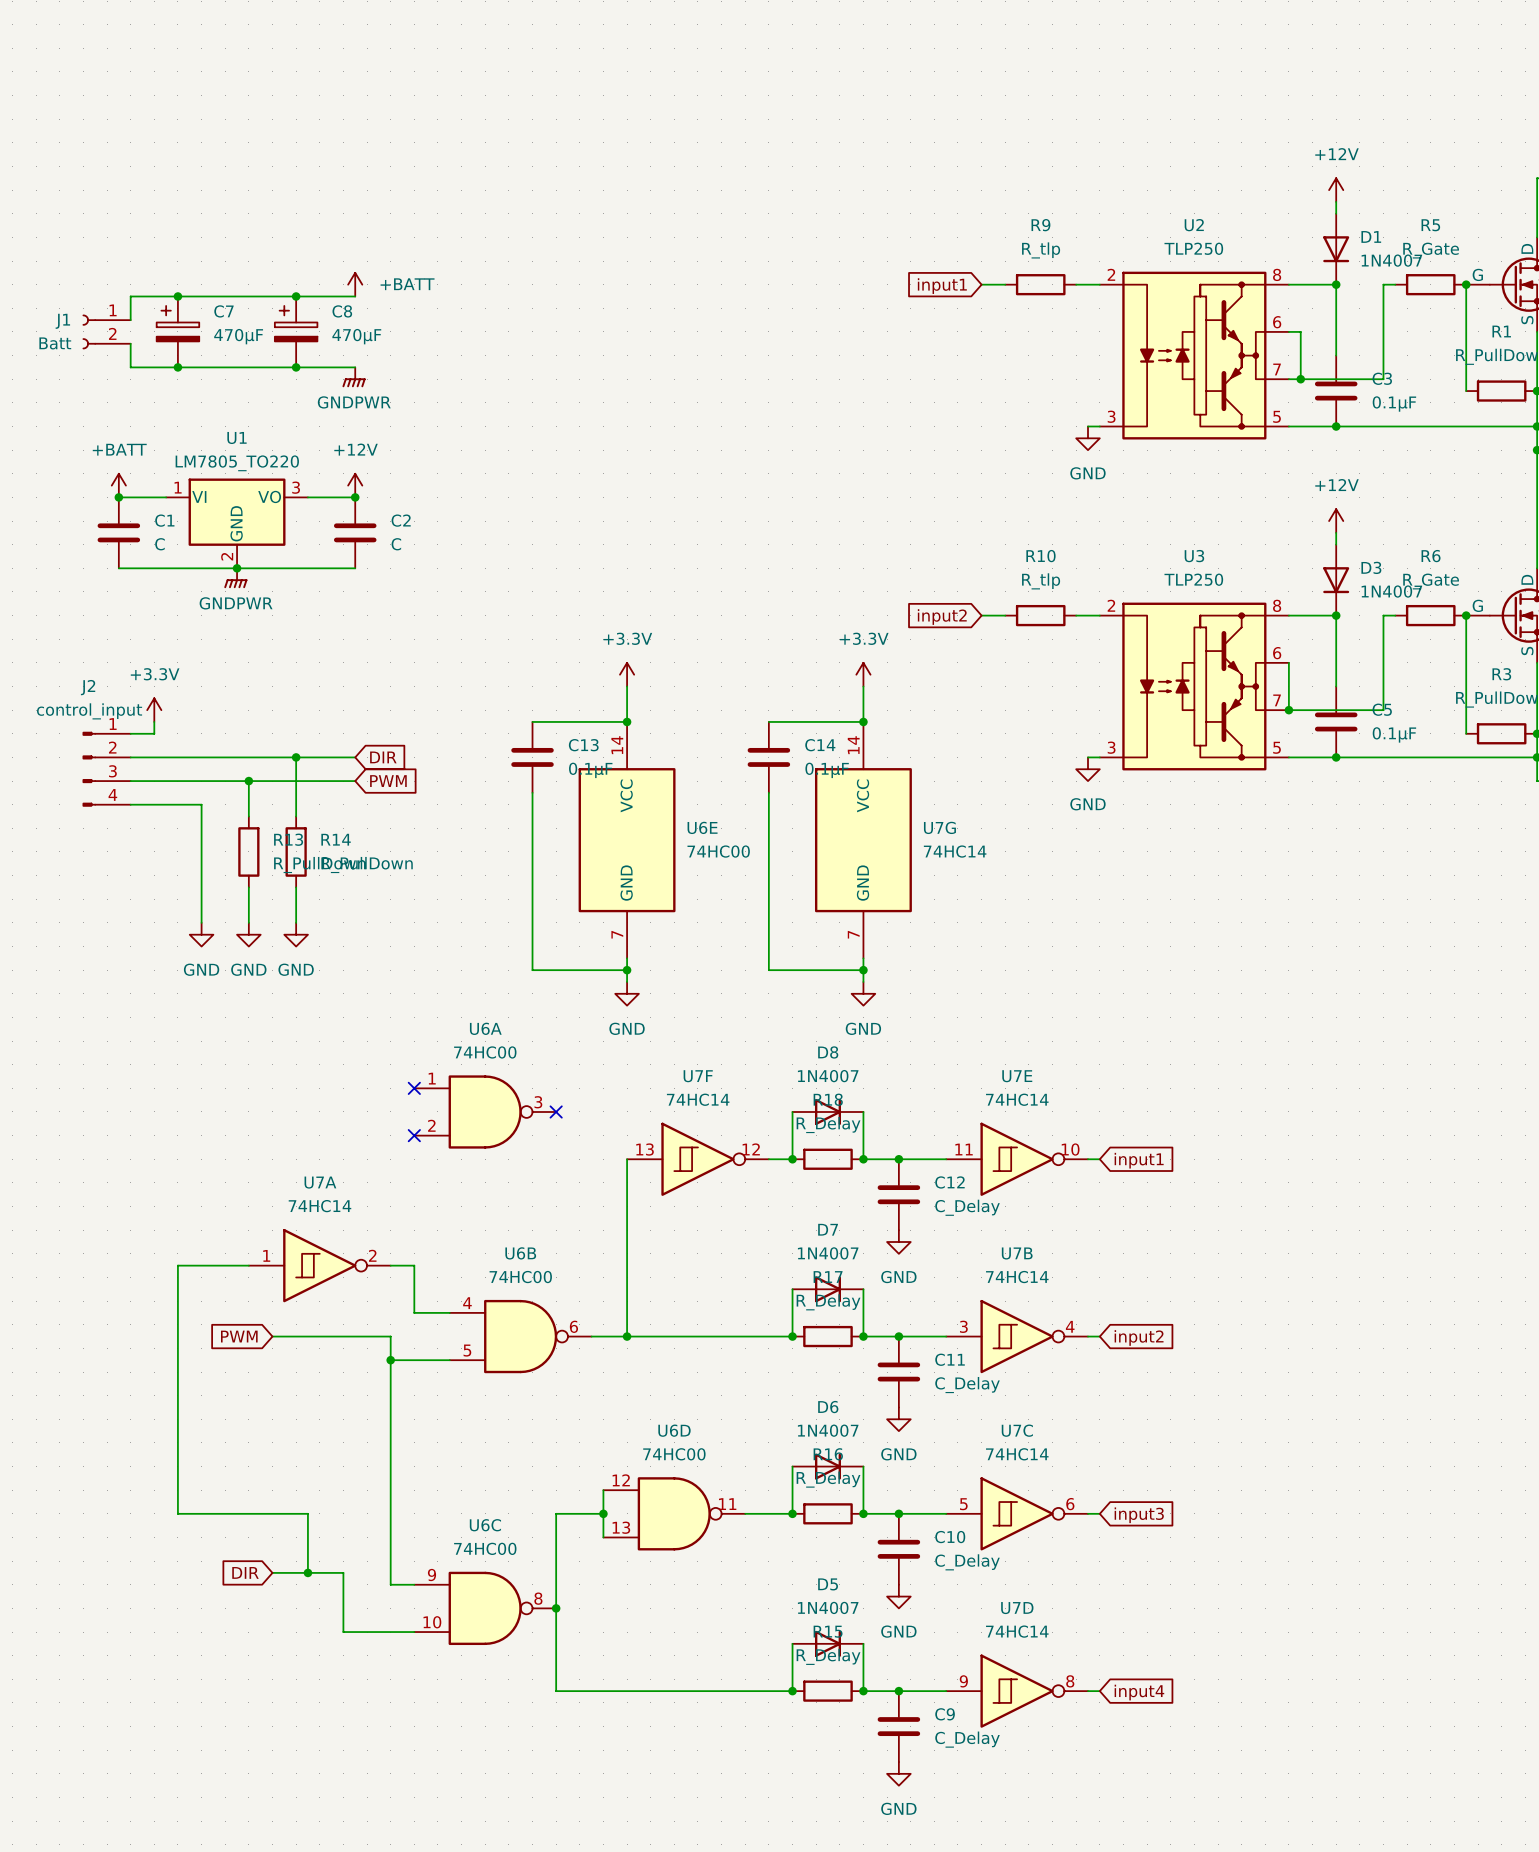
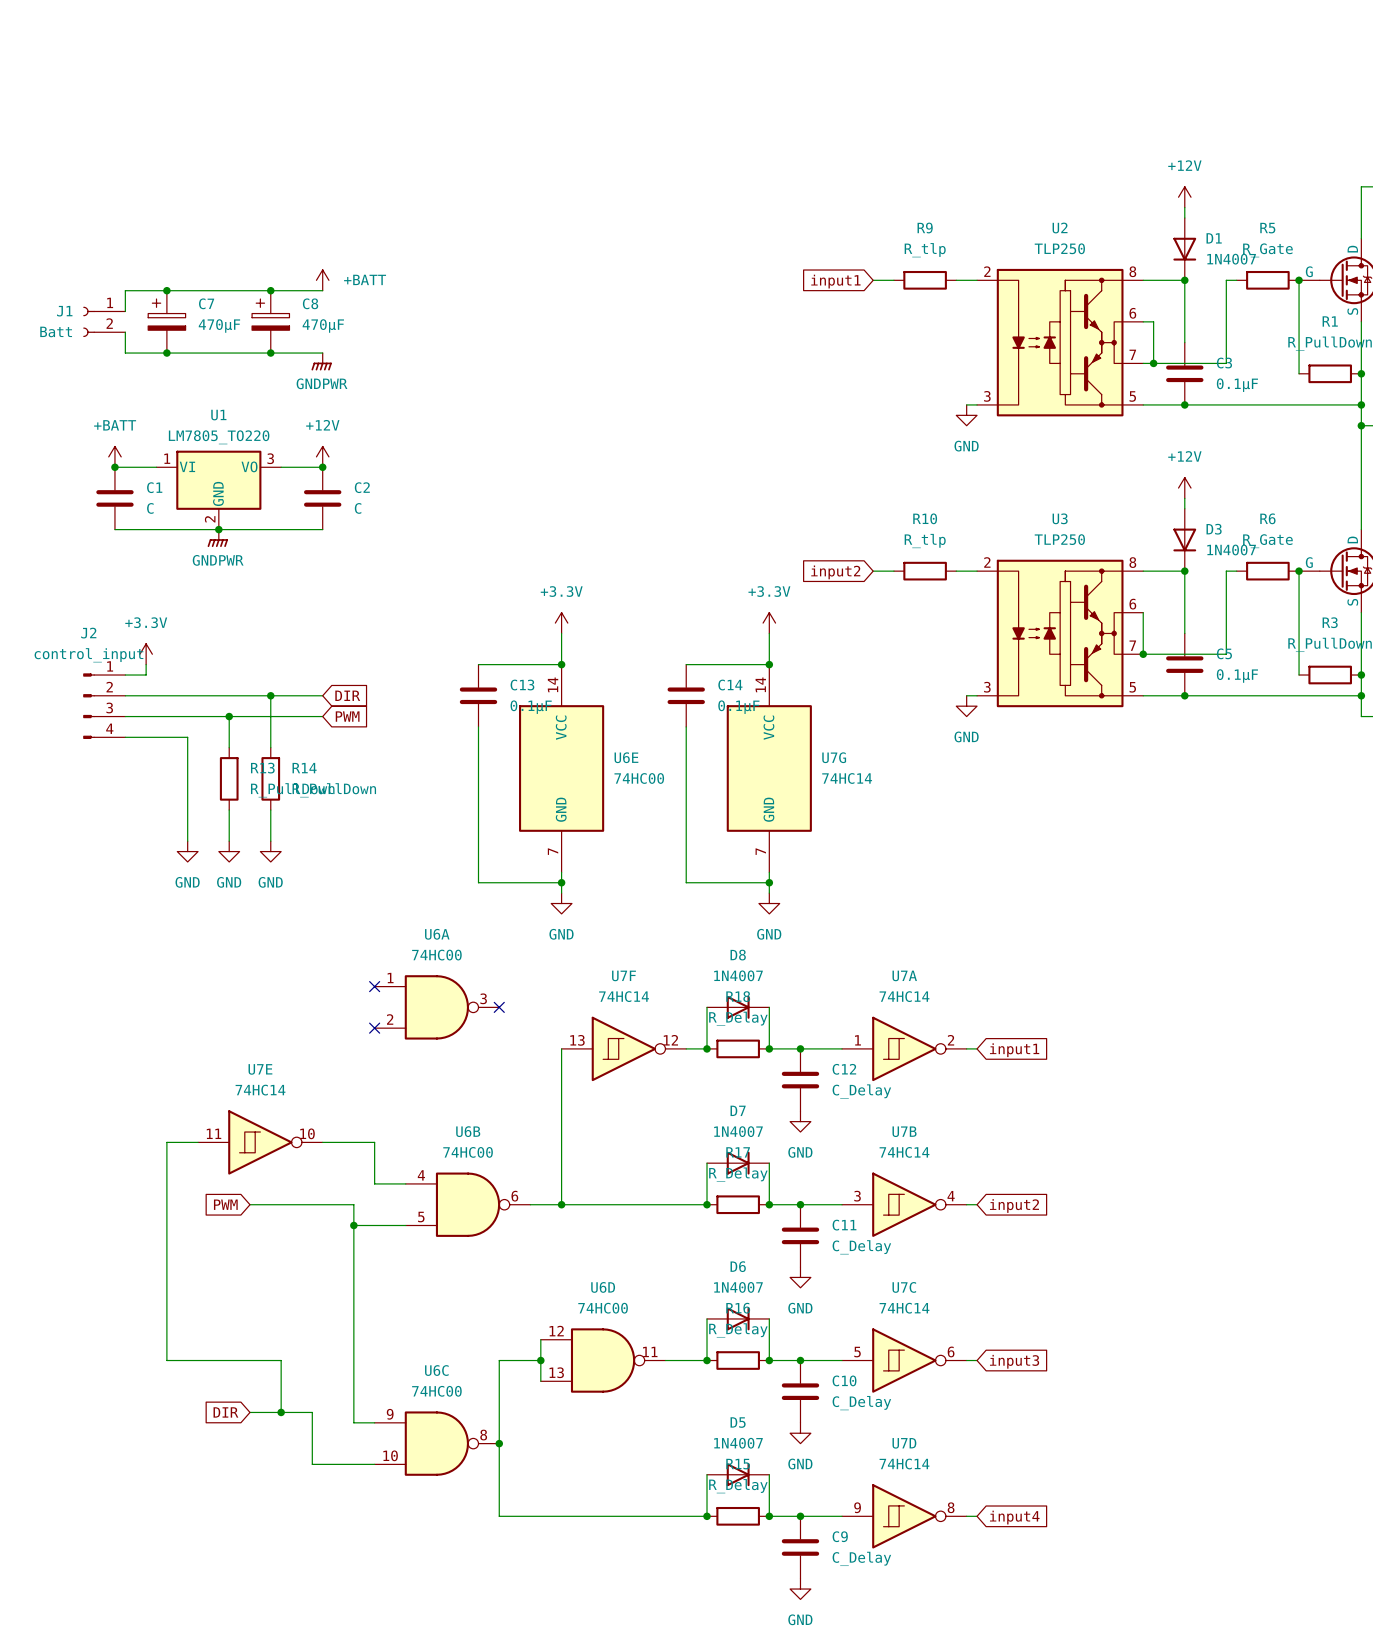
U7E position: (1017, 1159) -> (260, 1142)
U7A position: (319, 1265) -> (904, 1048)

